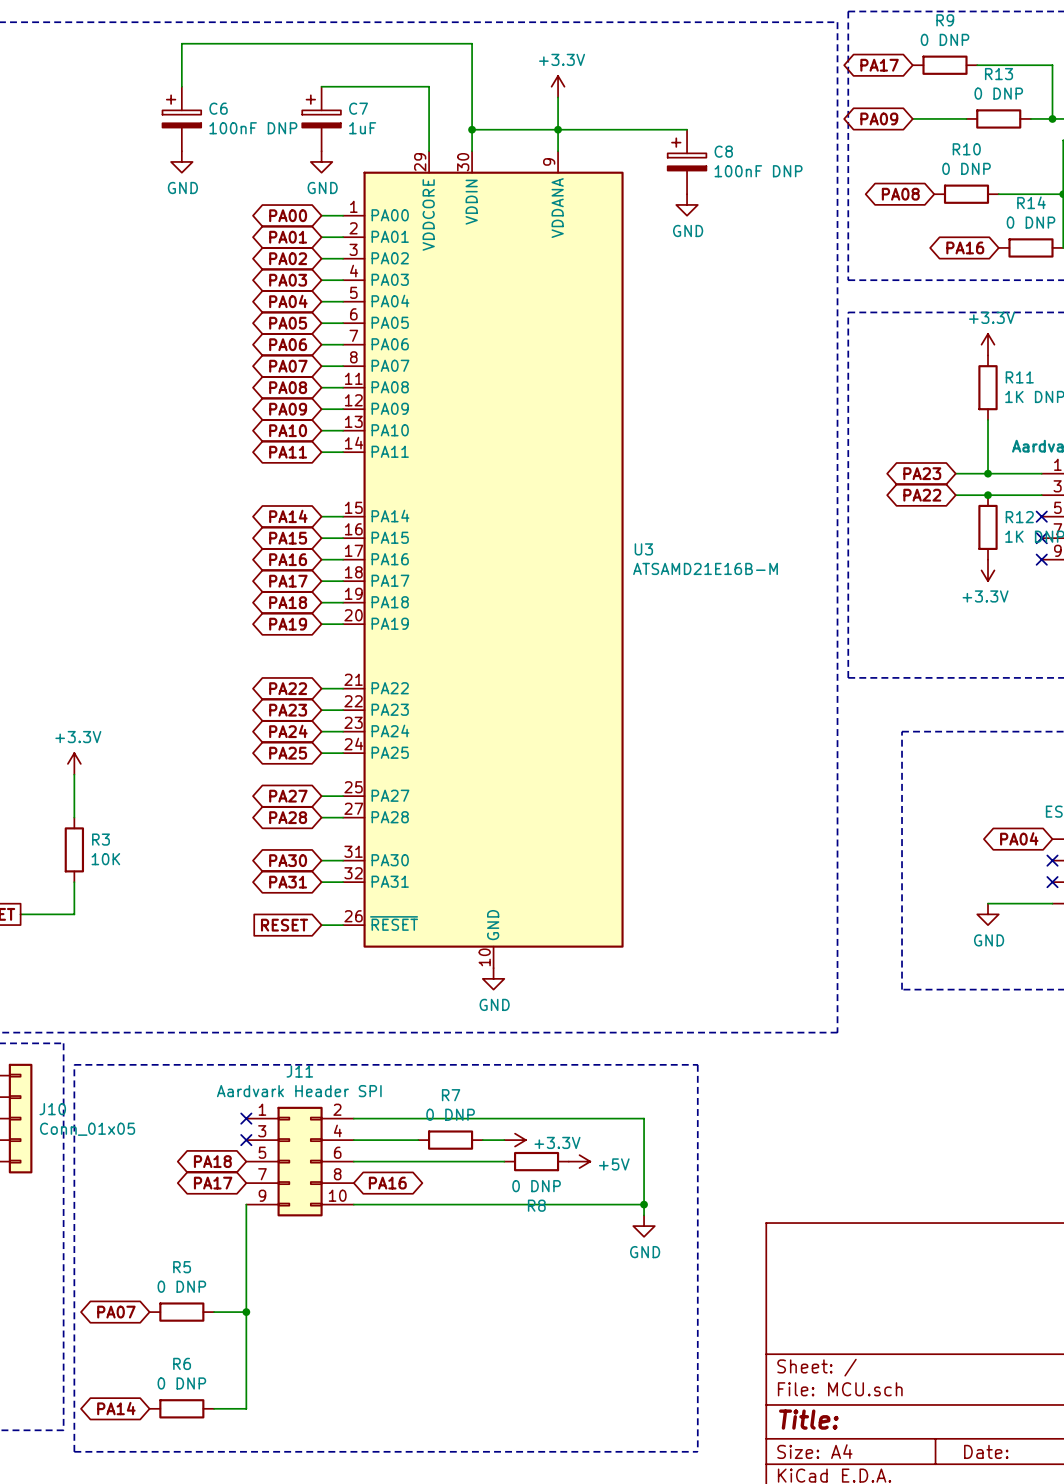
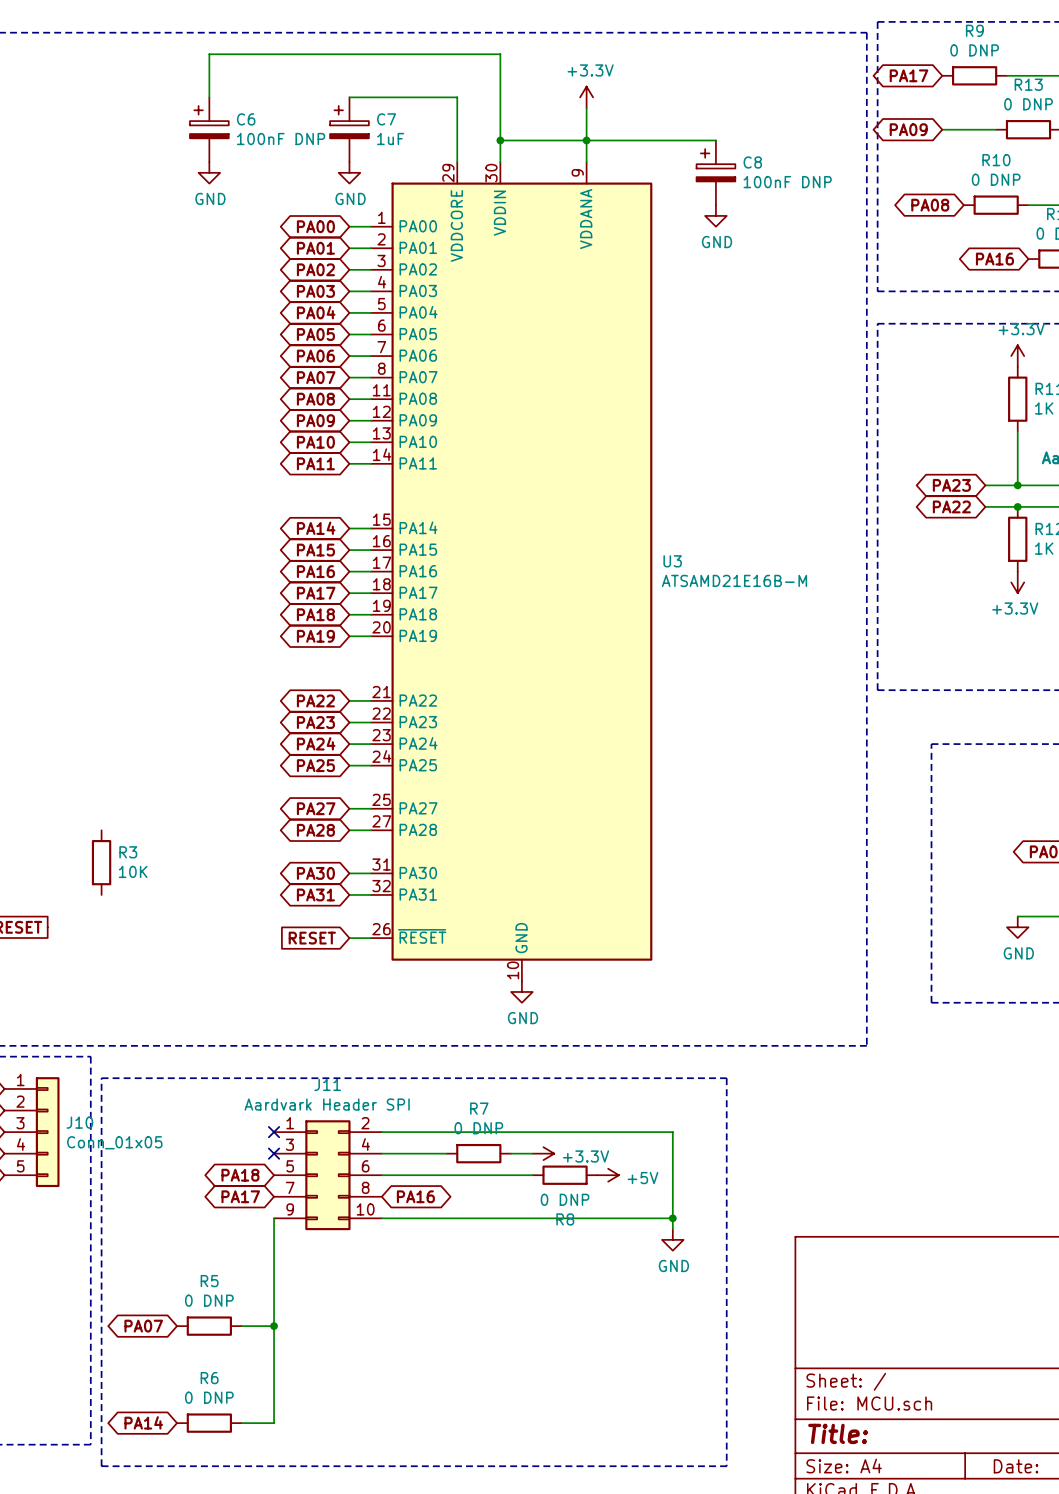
power symbol: +3.3V (74, 763) -> none
wire: (74, 774) (74, 817) -> none
wire: (74, 882) (74, 914) (20, 914) -> none

